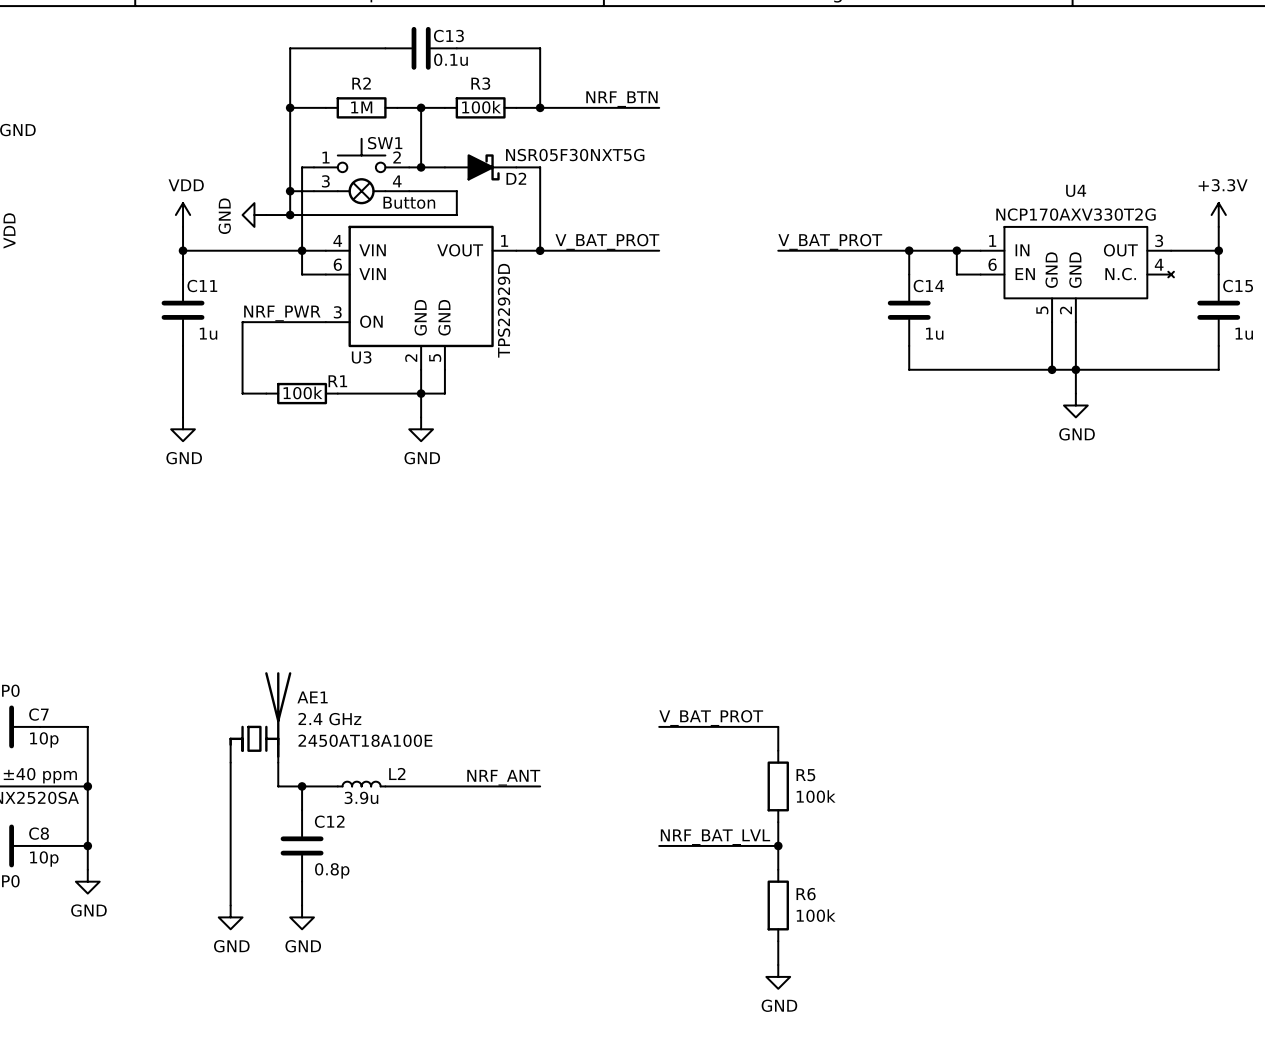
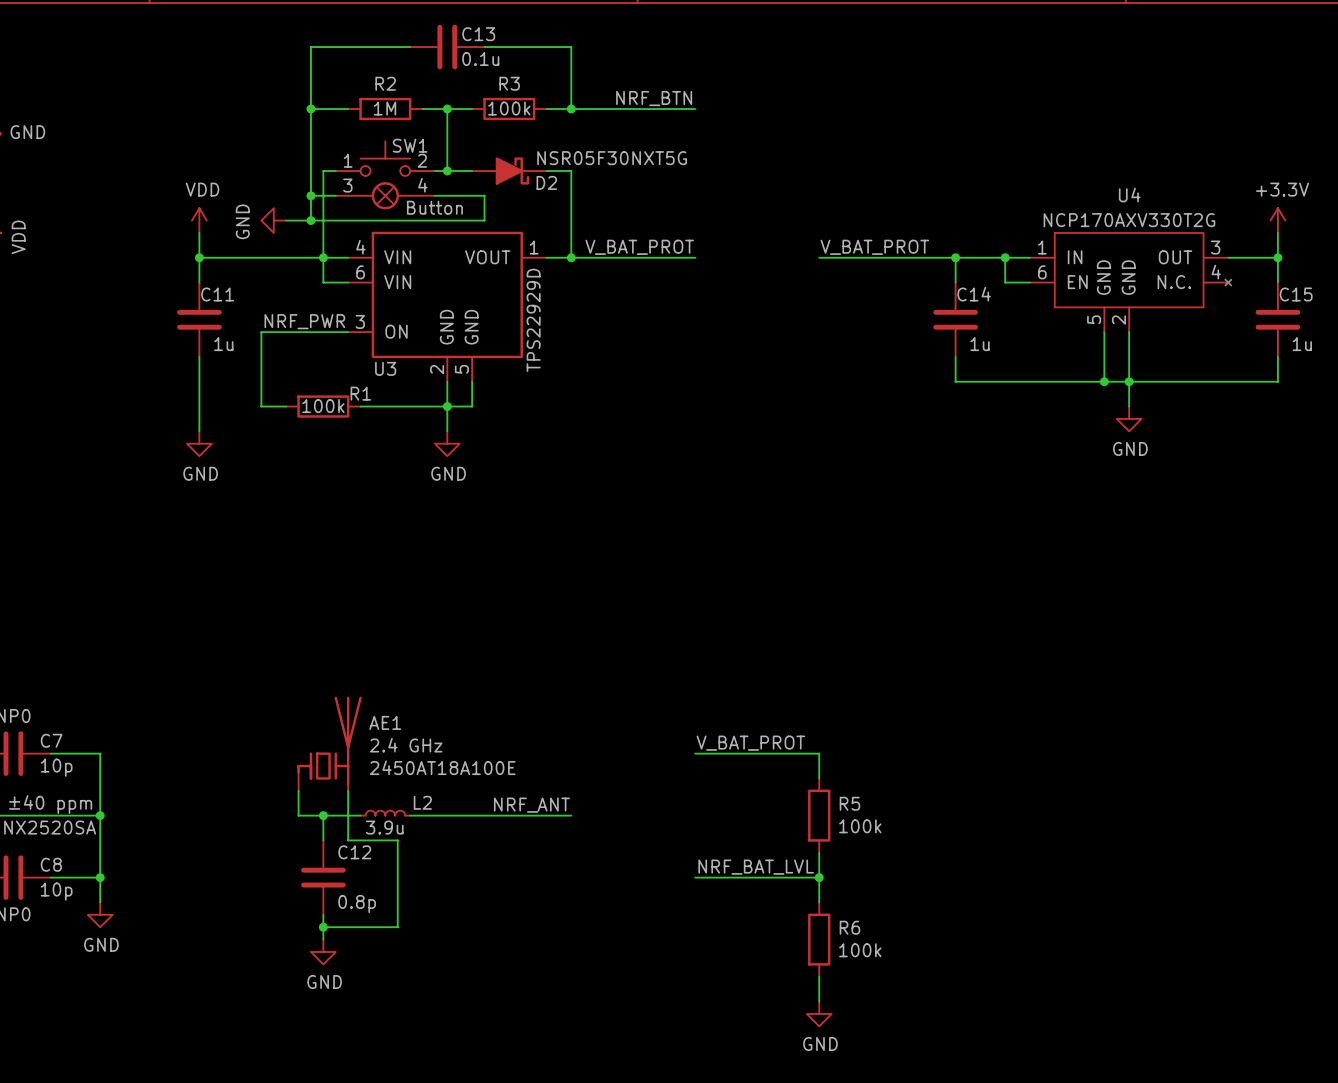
AE1 position: (260, 717) -> (329, 743)
wire: (230, 762) (230, 905) -> none
wire: none -> (348, 790) (348, 840) (397, 840) (397, 927) (323, 927)
junction: none -> (323, 927)
power symbol: GND (230, 917) -> none

